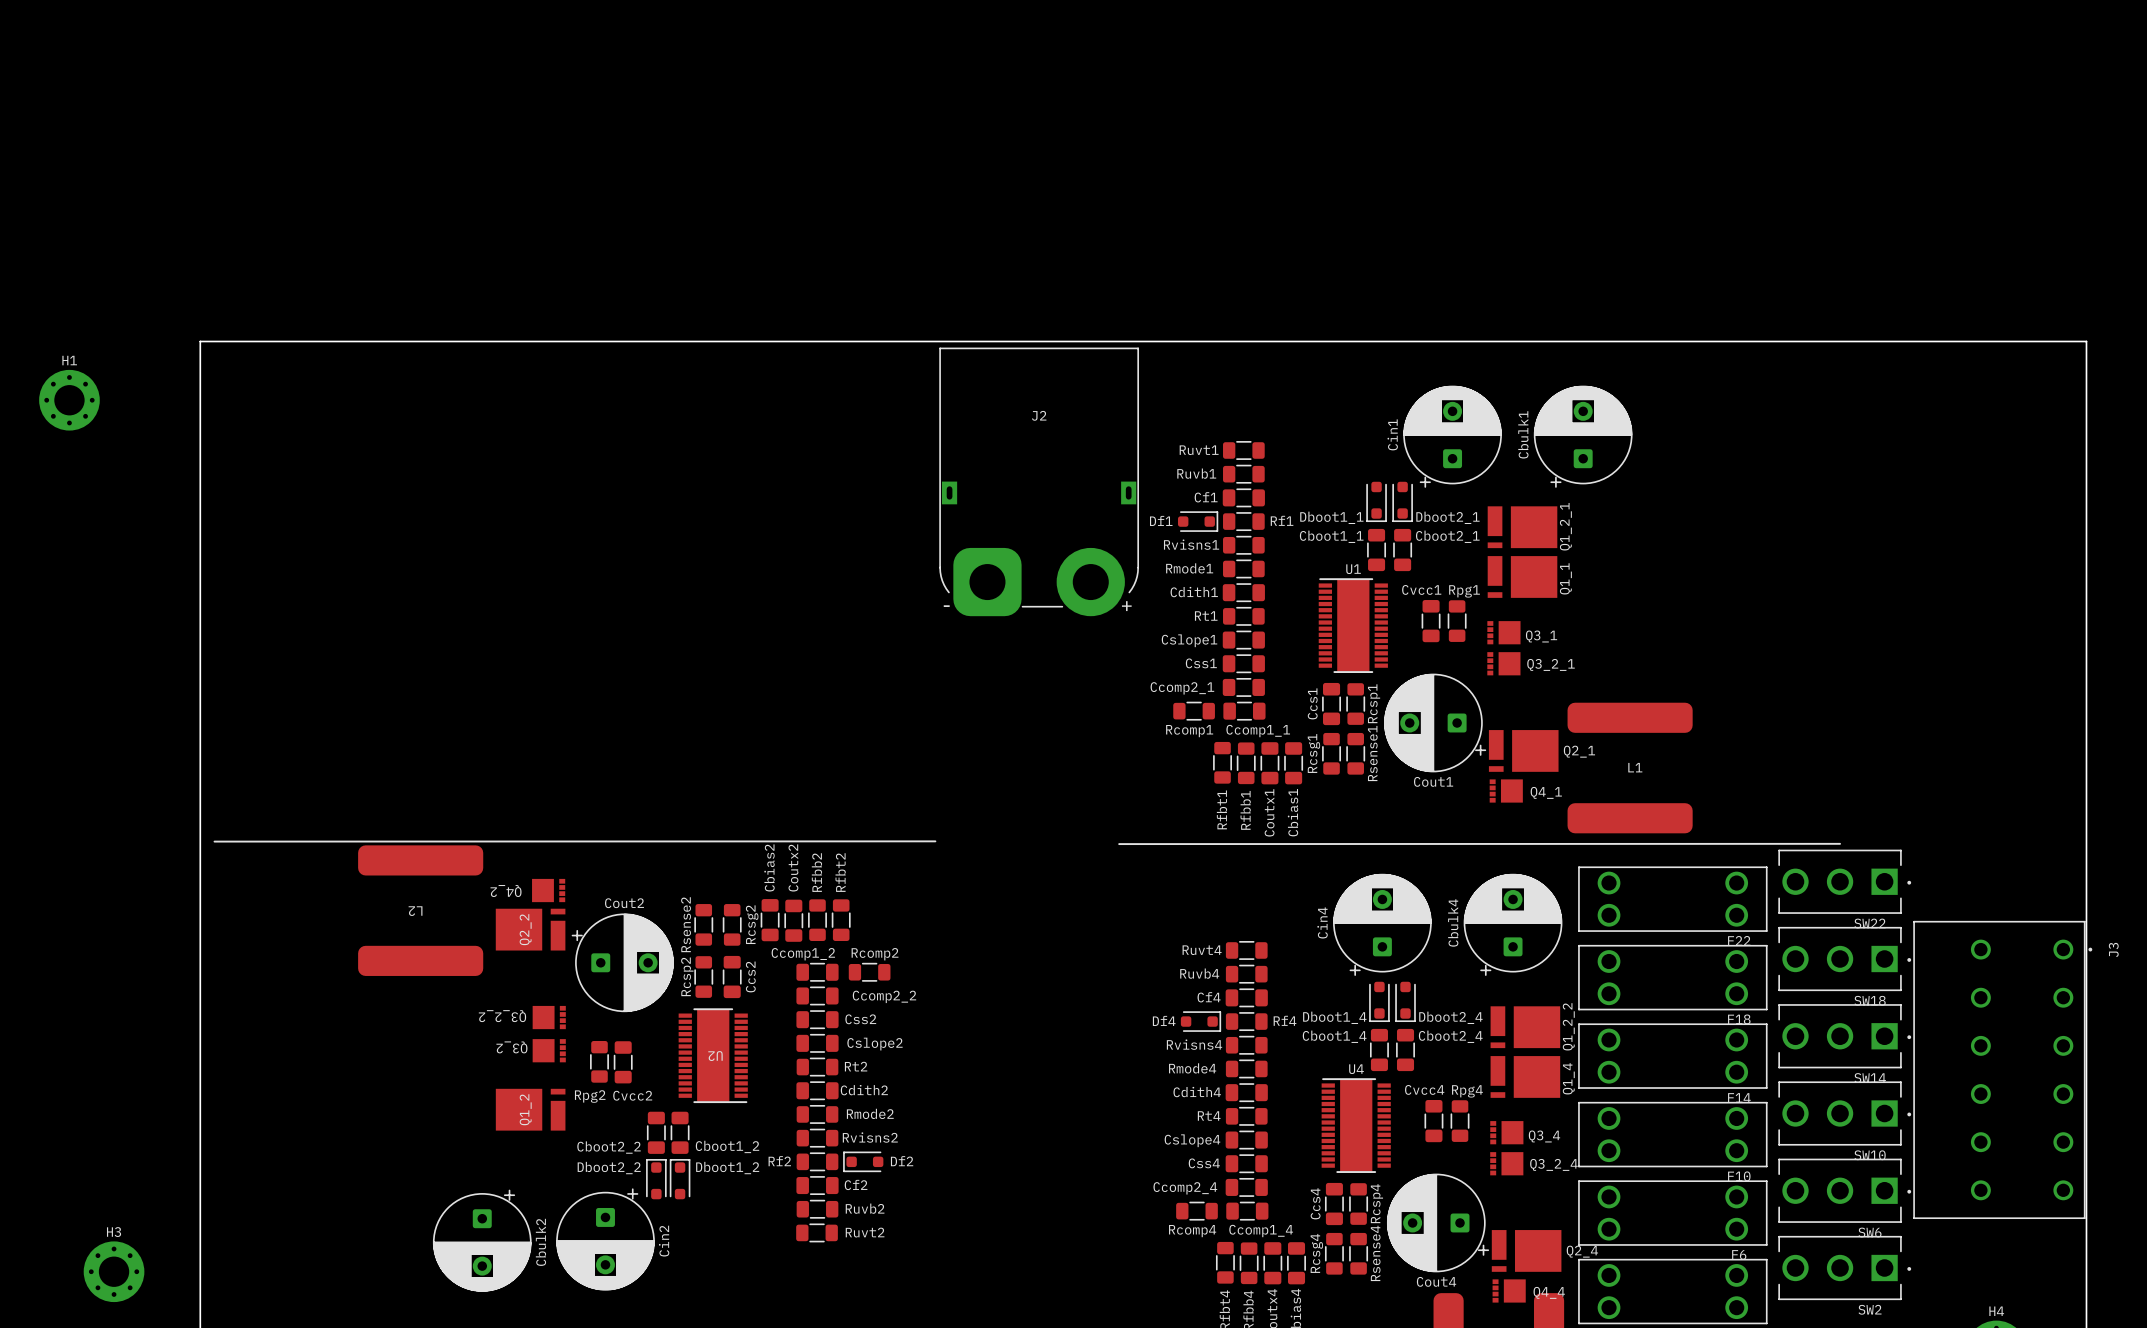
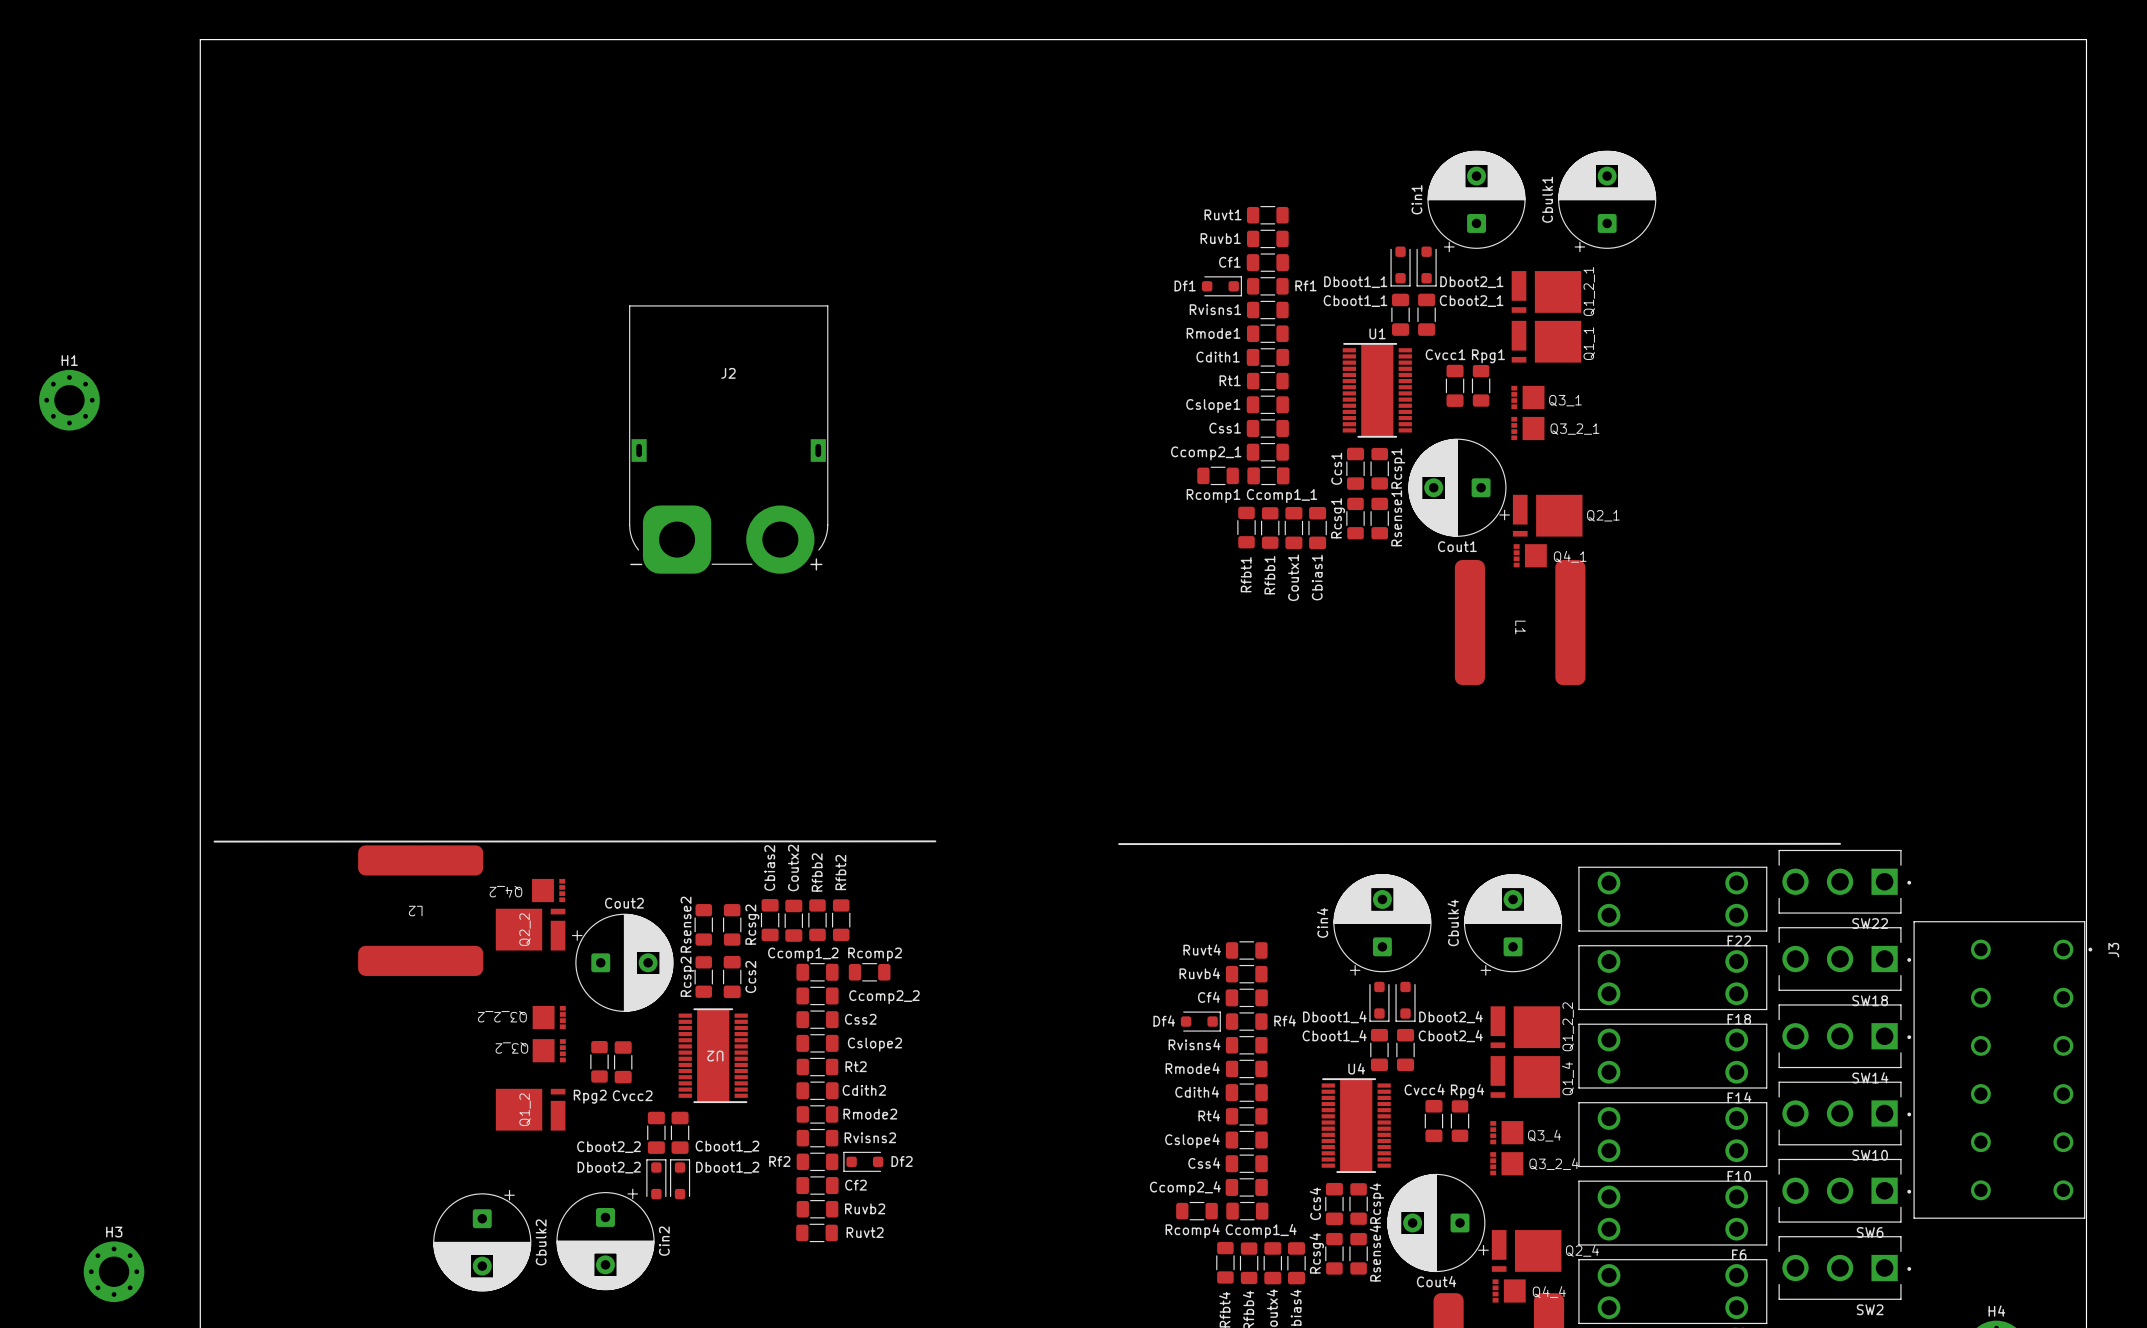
board edge: (200, 341) (2086, 341) -> (200, 341) (200, 39) (2086, 39) (2086, 341)
Cin1 position: (1452, 436) -> (1476, 201)
Cbulk1 position: (1583, 436) -> (1607, 201)
Ruvt1 position: (1243, 450) -> (1267, 215)
Ruvb1 position: (1243, 474) -> (1267, 238)
J2 position: (1039, 482) -> (728, 439)
Cf1 position: (1243, 497) -> (1267, 262)
Dboot1_1 position: (1376, 501) -> (1400, 266)
Dboot2_1 position: (1402, 501) -> (1426, 266)
Df1 position: (1197, 521) -> (1221, 286)
Rf1 position: (1243, 521) -> (1267, 286)
Q1_2_1 position: (1522, 527) -> (1546, 291)
Rvisns1 position: (1243, 545) -> (1267, 310)
Cboot1_1 position: (1376, 550) -> (1400, 314)
Cboot2_1 position: (1402, 550) -> (1426, 314)
Rmode1 position: (1243, 568) -> (1267, 333)
Q1_1 position: (1522, 576) -> (1546, 341)
Cdith1 position: (1243, 592) -> (1267, 357)
Rt1 position: (1243, 616) -> (1267, 381)
Cvcc1 position: (1431, 621) -> (1455, 385)
Rpg1 position: (1457, 621) -> (1481, 385)
U1 position: (1353, 625) -> (1377, 390)
Q3_1 position: (1503, 632) -> (1527, 397)
Cslope1 position: (1243, 640) -> (1267, 404)
Css1 position: (1243, 663) -> (1267, 428)
Q3_2_1 position: (1503, 663) -> (1527, 428)
Ccomp2_1 position: (1243, 687) -> (1267, 452)
Ccs1 position: (1331, 704) -> (1355, 468)
Rcsp1 position: (1355, 704) -> (1379, 468)
Rcomp1 position: (1194, 711) -> (1218, 475)
Ccomp1_1 position: (1244, 711) -> (1268, 475)
Cout1 position: (1435, 722) -> (1459, 487)
Q2_1 position: (1523, 750) -> (1547, 515)
Rcsg1 position: (1331, 753) -> (1355, 518)
Rsense1 position: (1355, 753) -> (1379, 518)
Rfbt1 position: (1222, 762) -> (1246, 527)
Rfbb1 position: (1246, 763) -> (1270, 528)
Coutx1 position: (1269, 763) -> (1293, 528)
Cbias1 position: (1293, 763) -> (1317, 528)
L1 rotation: 0° (1630, 768) -> 90° clockwise (1520, 622)
L1 position: (1630, 768) -> (1520, 622)
Q4_1 position: (1506, 791) -> (1530, 555)

